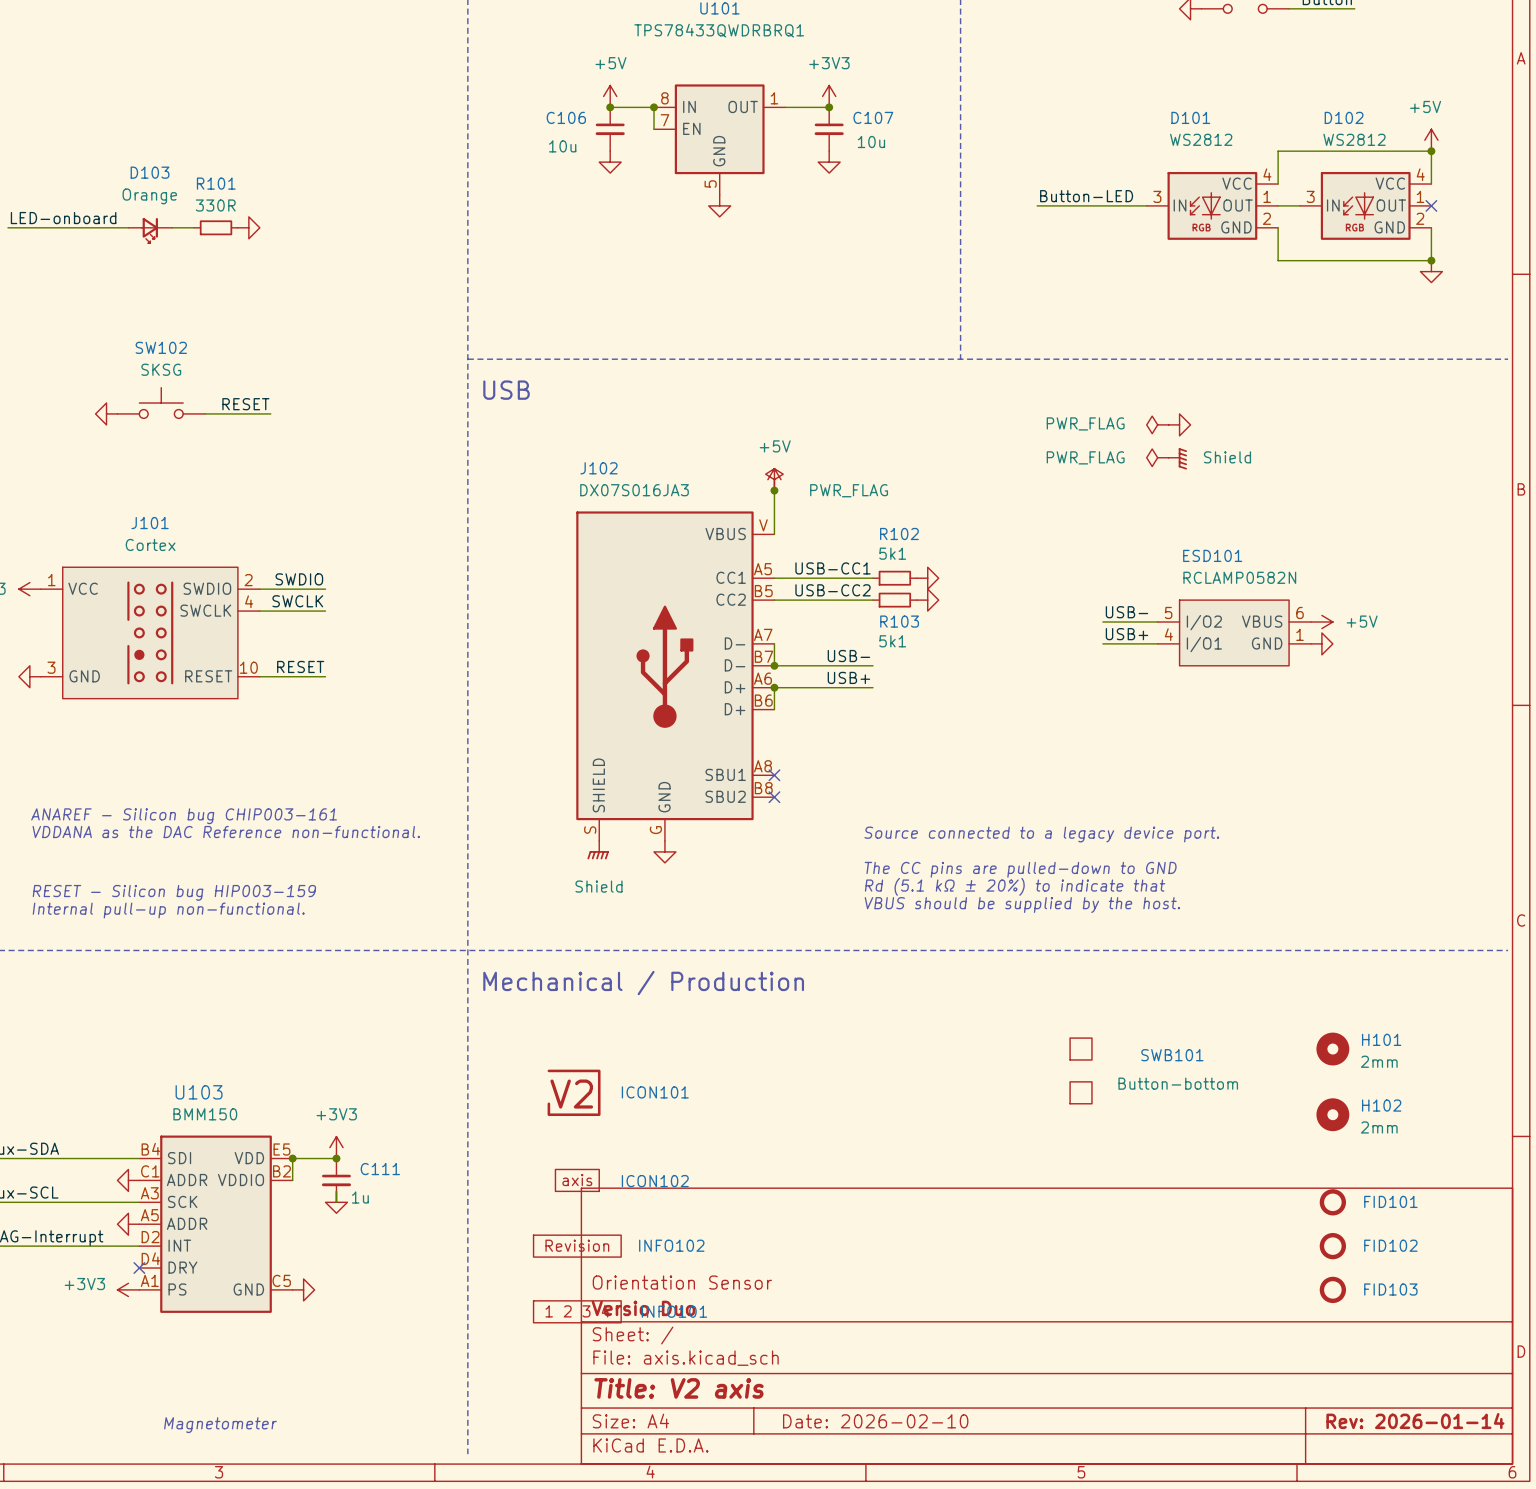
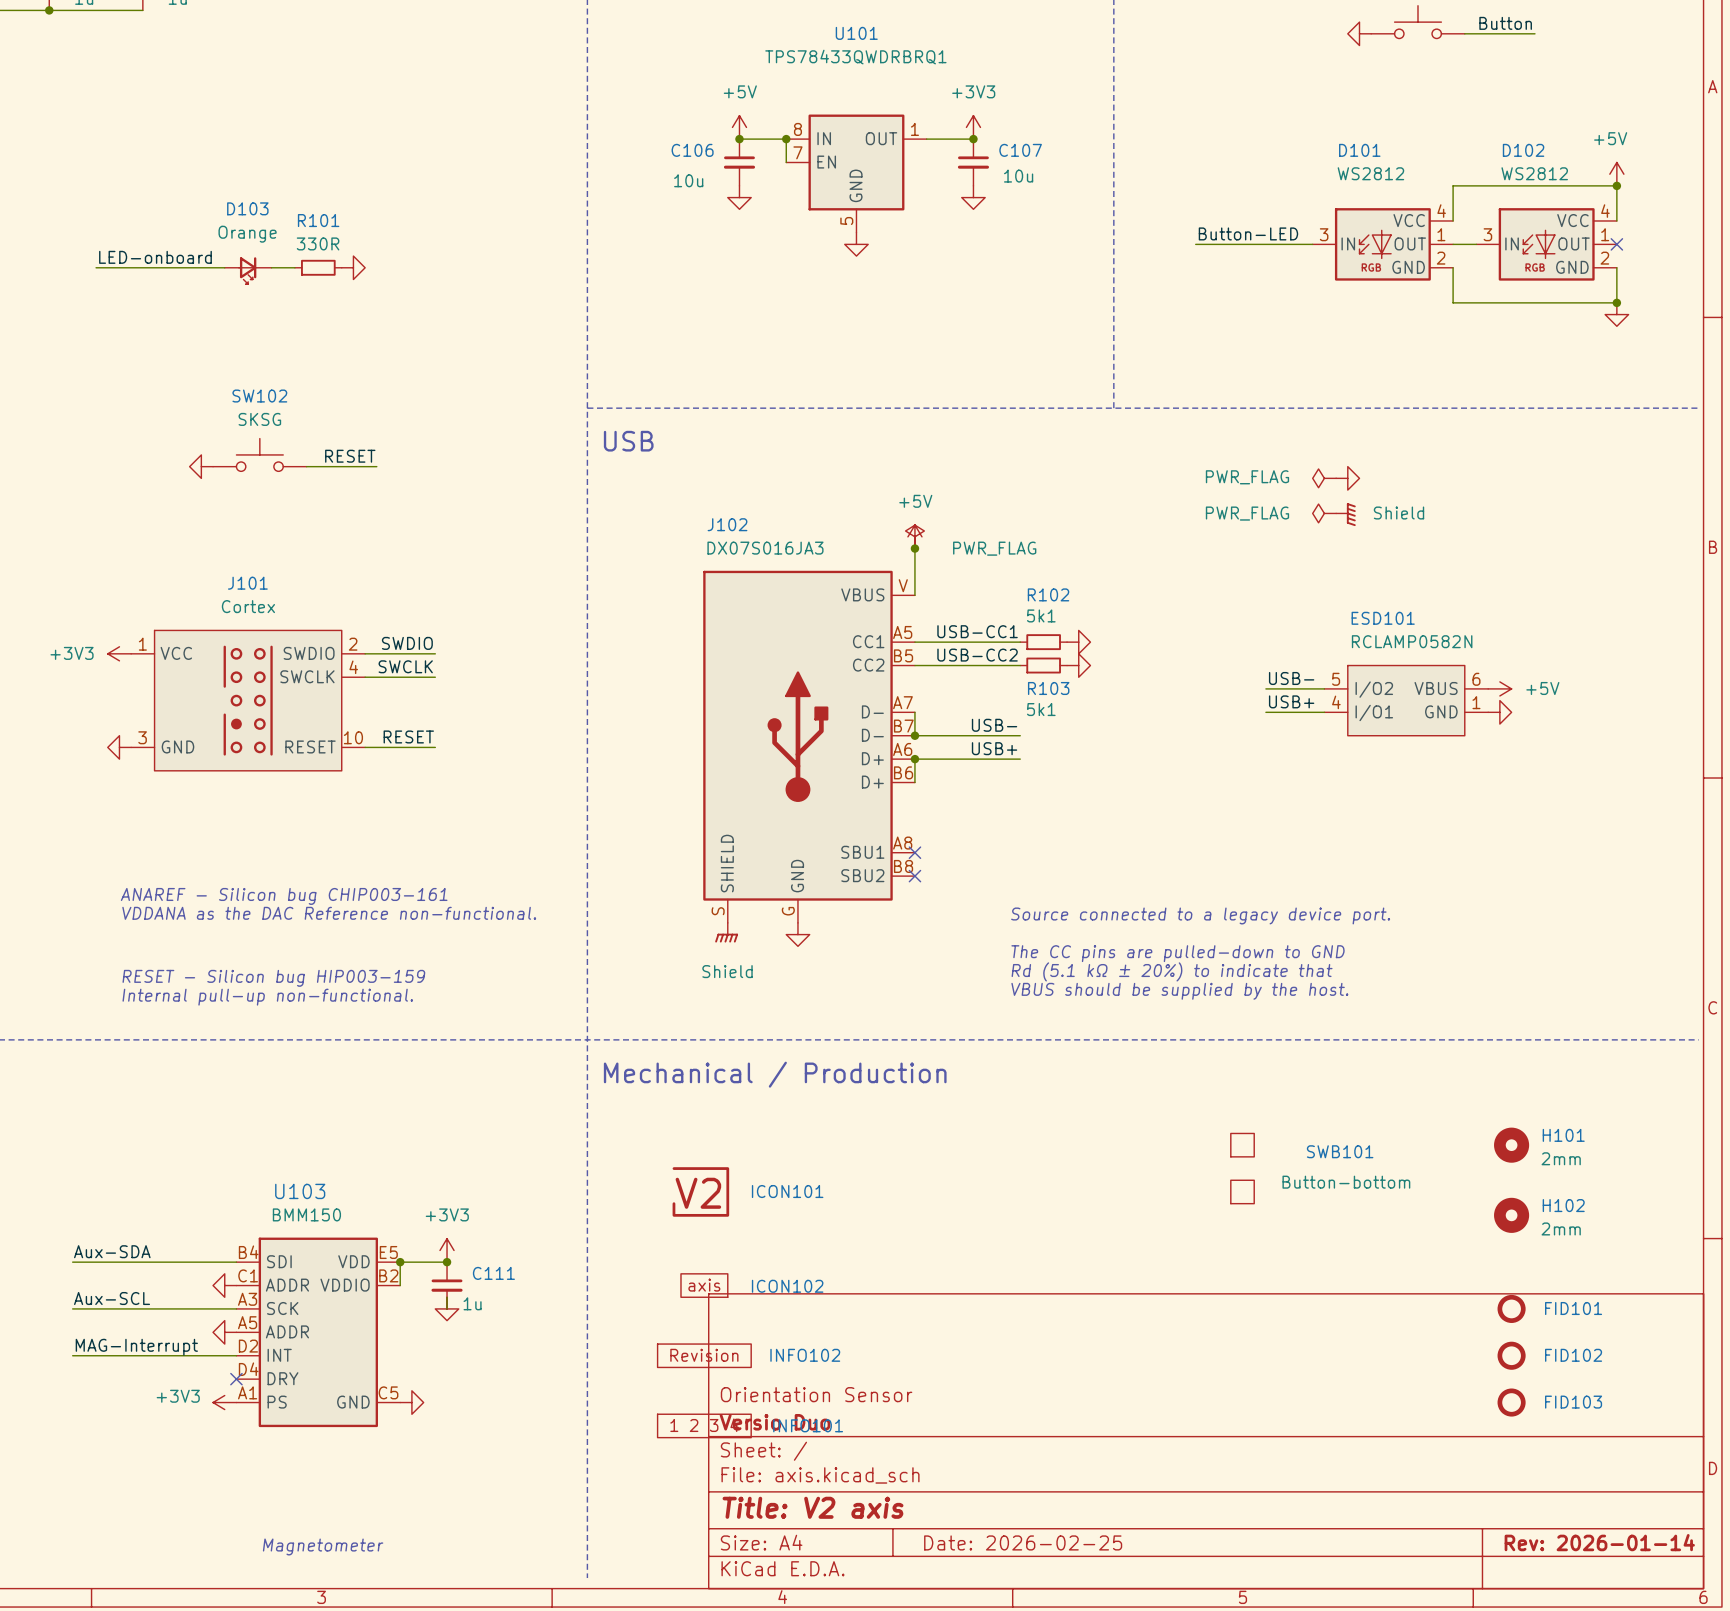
title block: Date: 2026-02-10 (875, 1421) -> Date: 2026-02-25 (1023, 1542)

